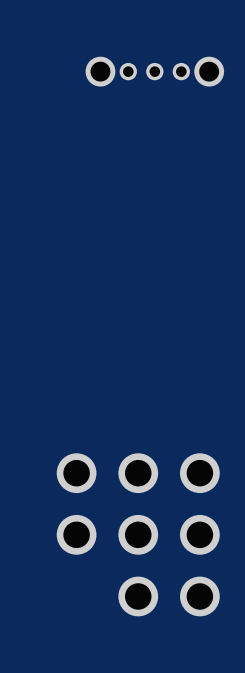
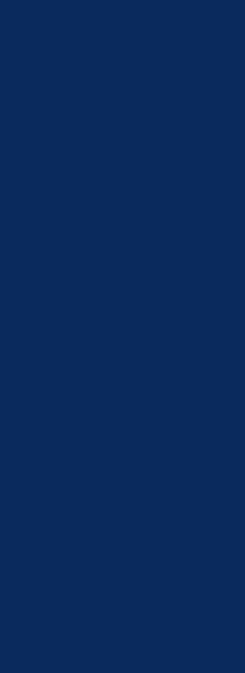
part: (154, 71) -> none
part: (76, 473) -> none
part: (138, 473) -> none
part: (199, 473) -> none
part: (76, 534) -> none
part: (138, 534) -> none
part: (199, 534) -> none
part: (138, 596) -> none
part: (199, 596) -> none

